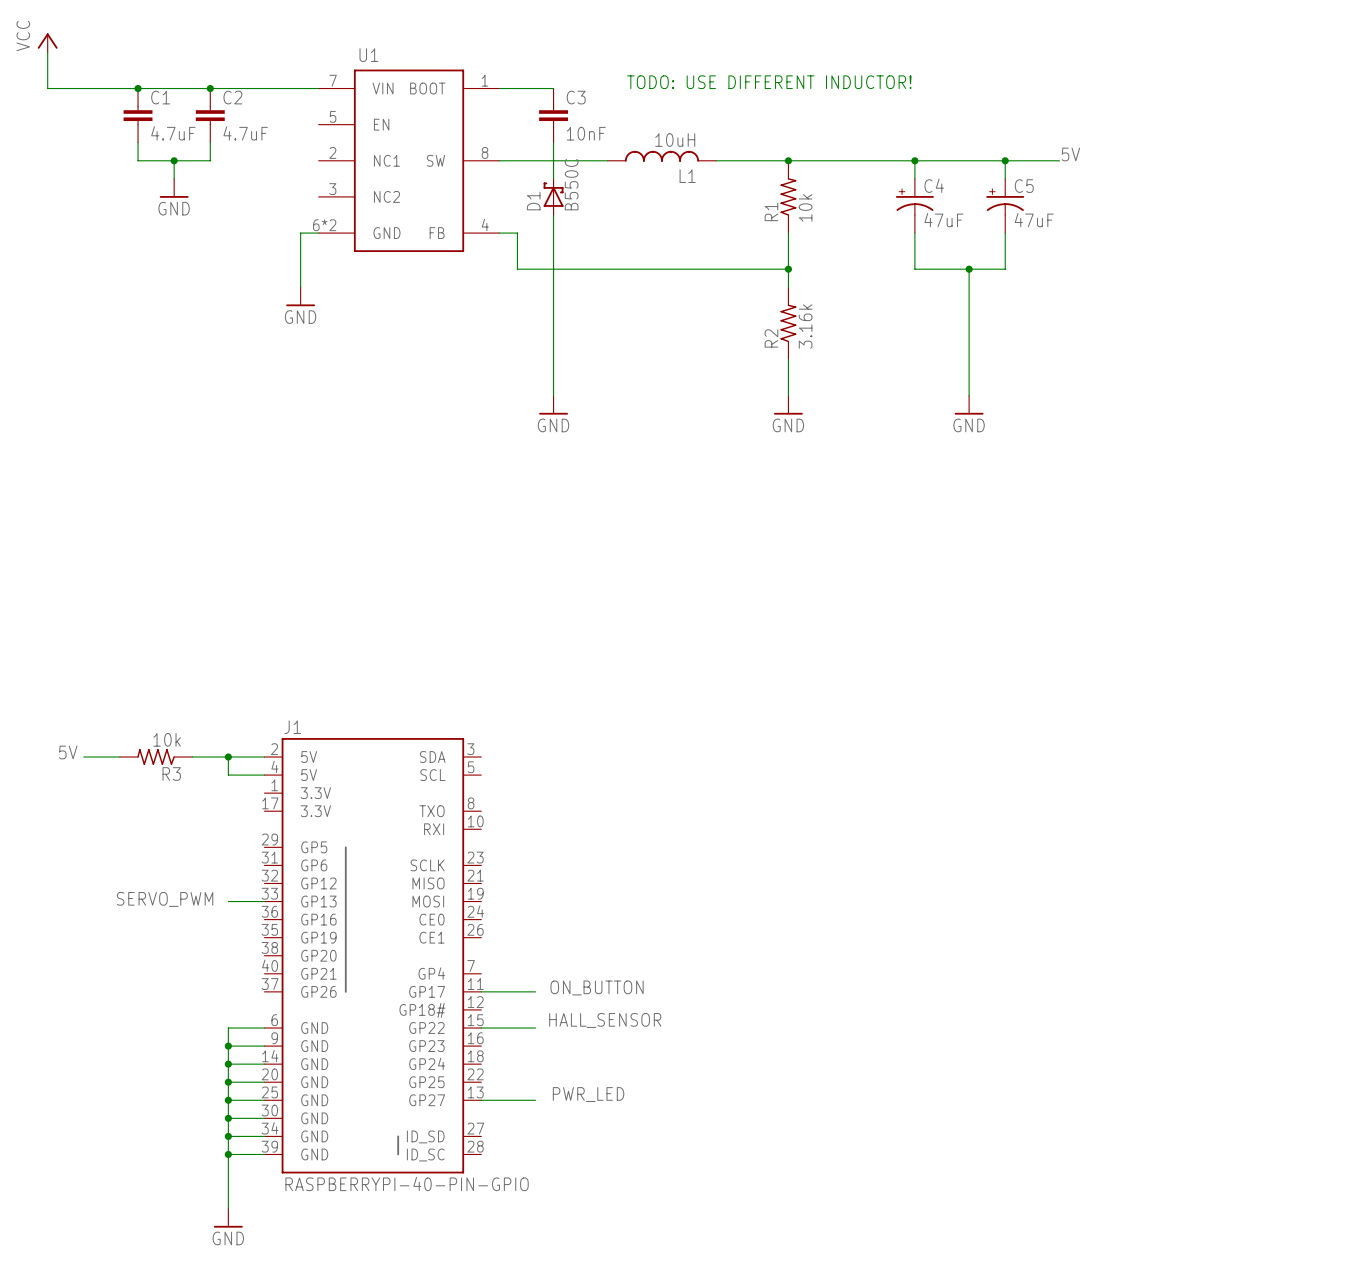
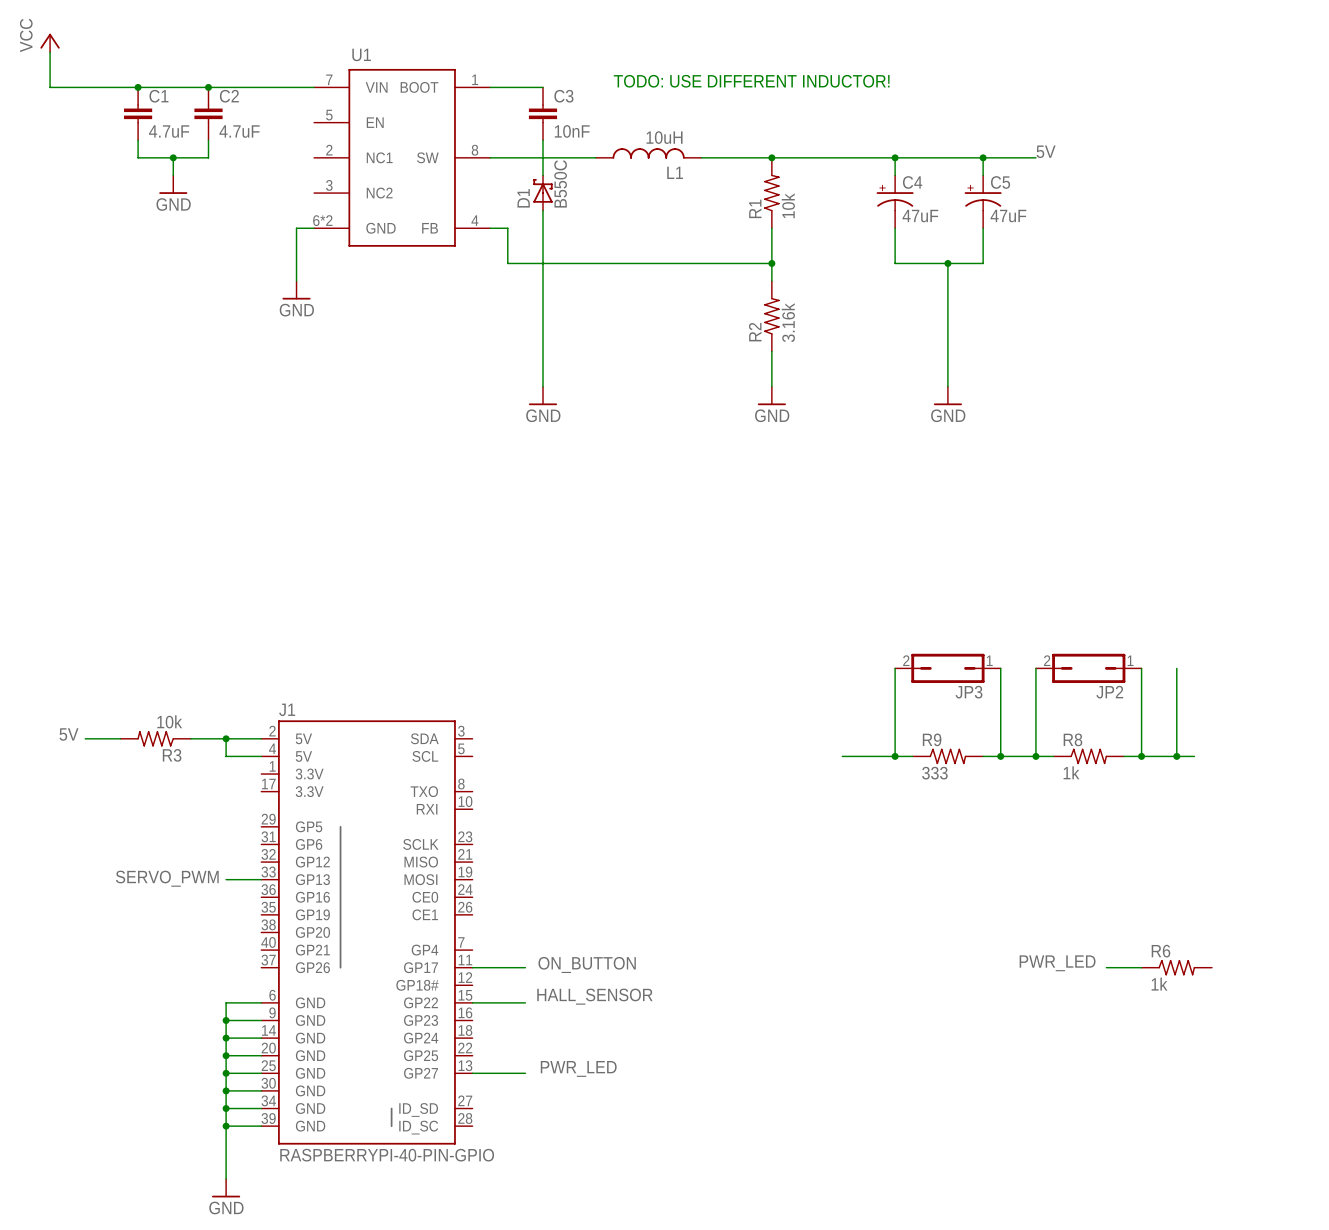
wire: none -> (895, 668) (895, 756)
JP3: none -> (947, 668)
wire: none -> (1000, 668) (1000, 756)
wire: none -> (1035, 668) (1035, 756)
JP2: none -> (1088, 668)
wire: none -> (1141, 668) (1141, 756)
wire: none -> (1176, 668) (1176, 756)
wire: none -> (842, 756) (912, 756)
junction: none -> (895, 756)
R9: none -> 333 (947, 756)
wire: none -> (983, 756) (1053, 756)
junction: none -> (1000, 756)
junction: none -> (1035, 756)
R8: none -> 1k (1088, 756)
wire: none -> (1123, 756) (1194, 756)
junction: none -> (1141, 756)
junction: none -> (1176, 756)
label: none -> PWR_LED (1057, 963)
wire: none -> (1106, 967) (1141, 967)
R6: none -> 1k (1176, 967)

